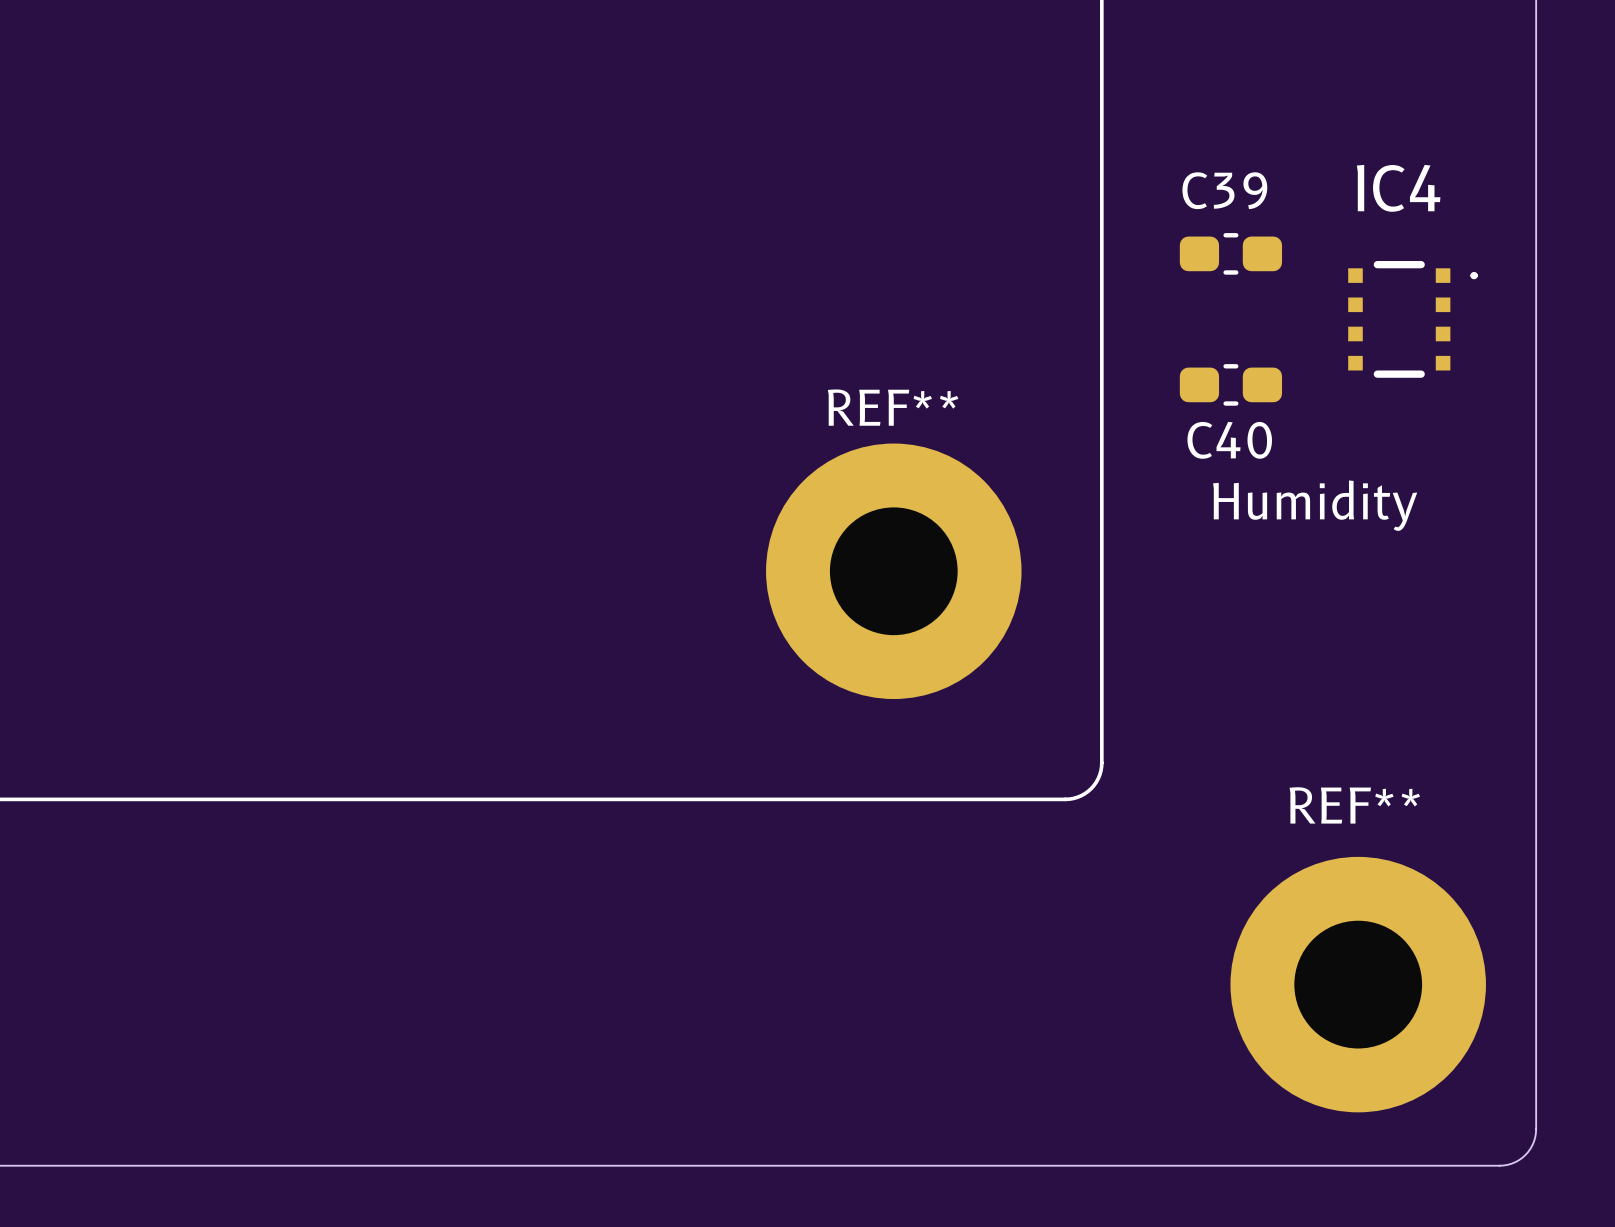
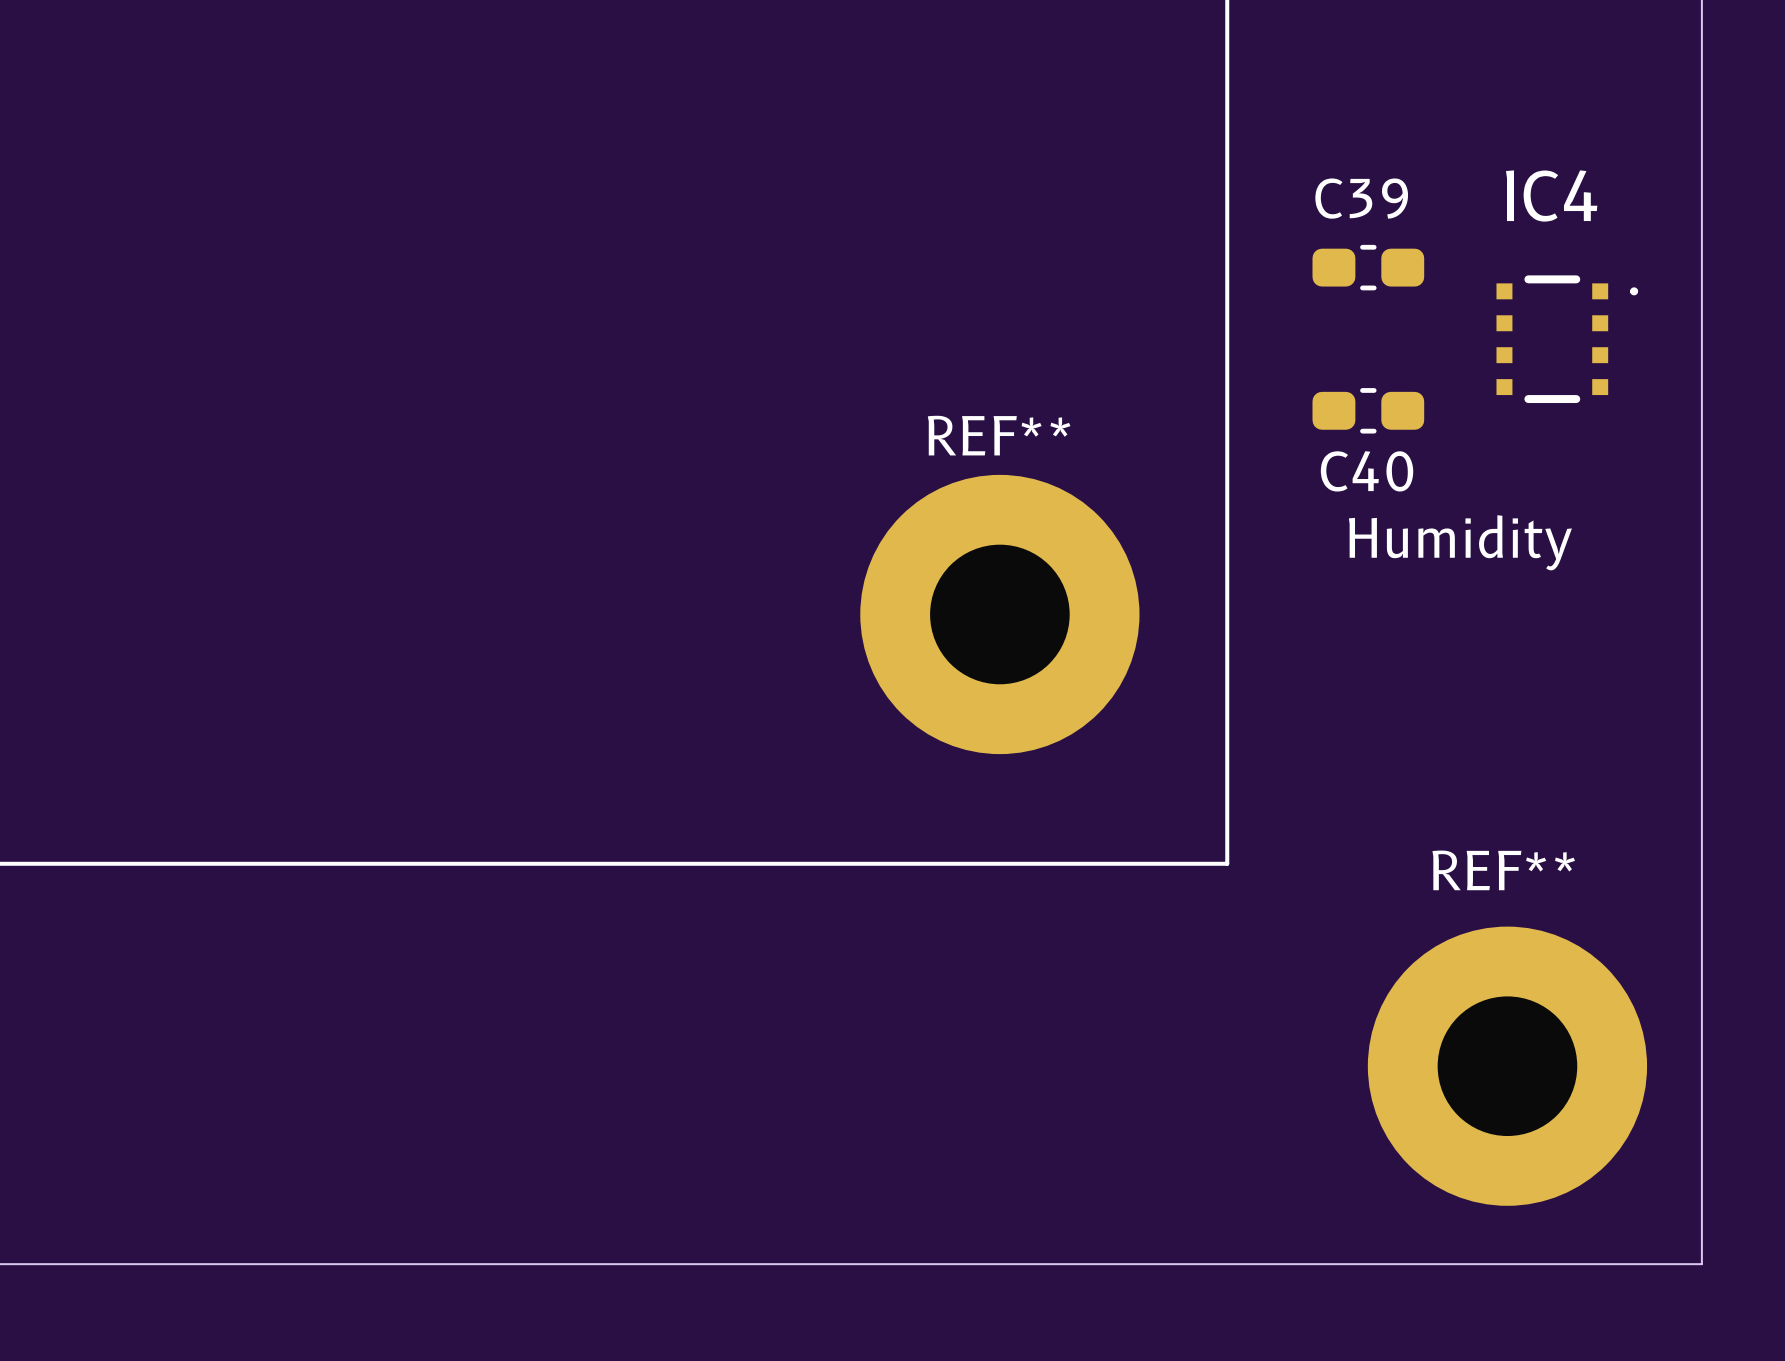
line: (1101, 762) (1099, 774) (1091, 788) (1077, 797) (1065, 799) -> (1227, 823) (1227, 863) (1187, 863)
board edge: (1536, 1129) (1532, 1145) (1525, 1155) (1511, 1163) (1499, 1165) -> (1701, 1224) (1701, 1264) (1662, 1264)

